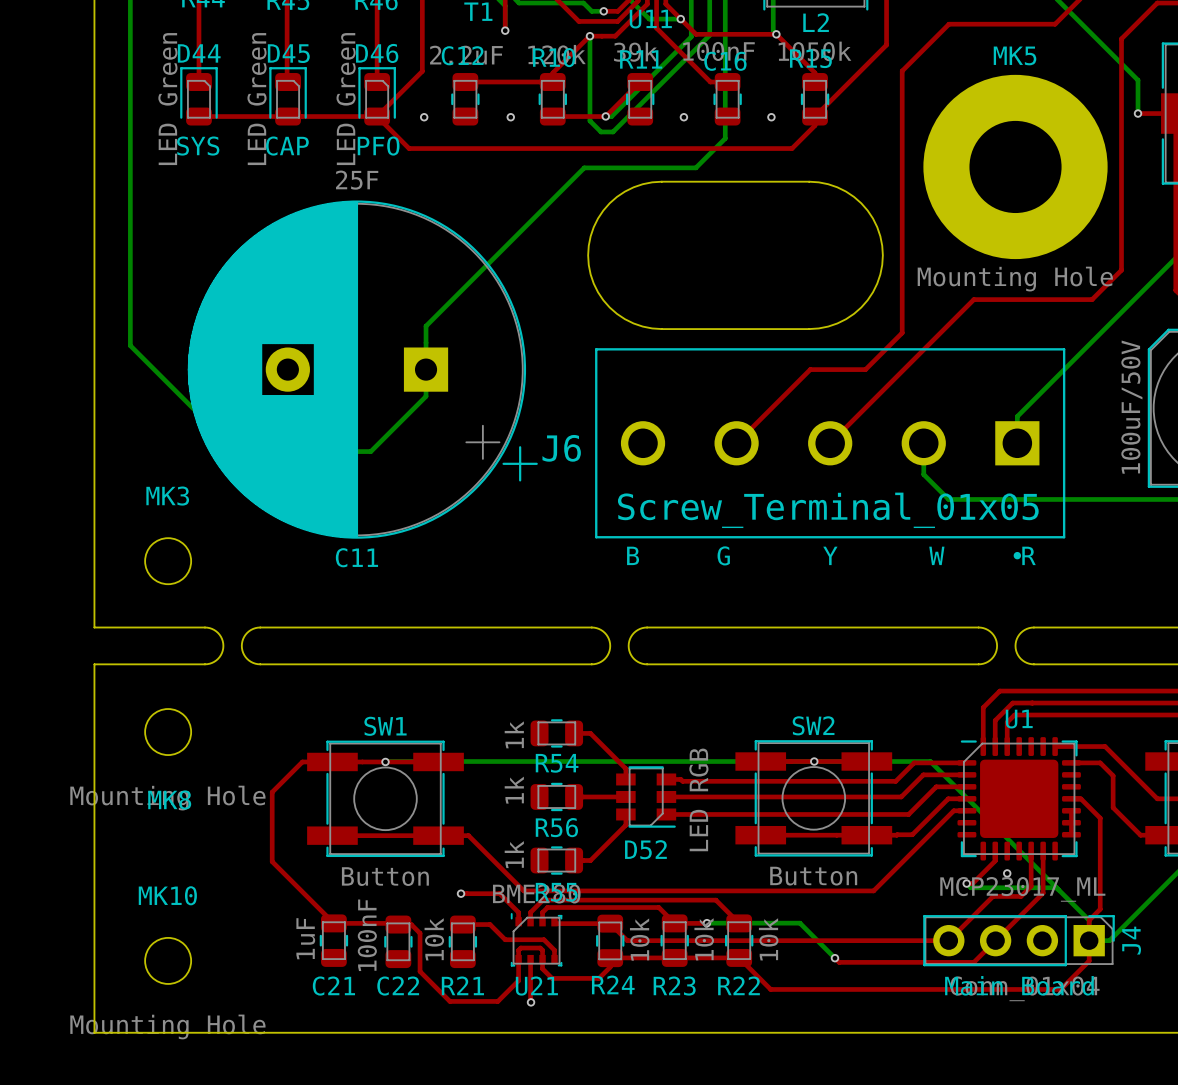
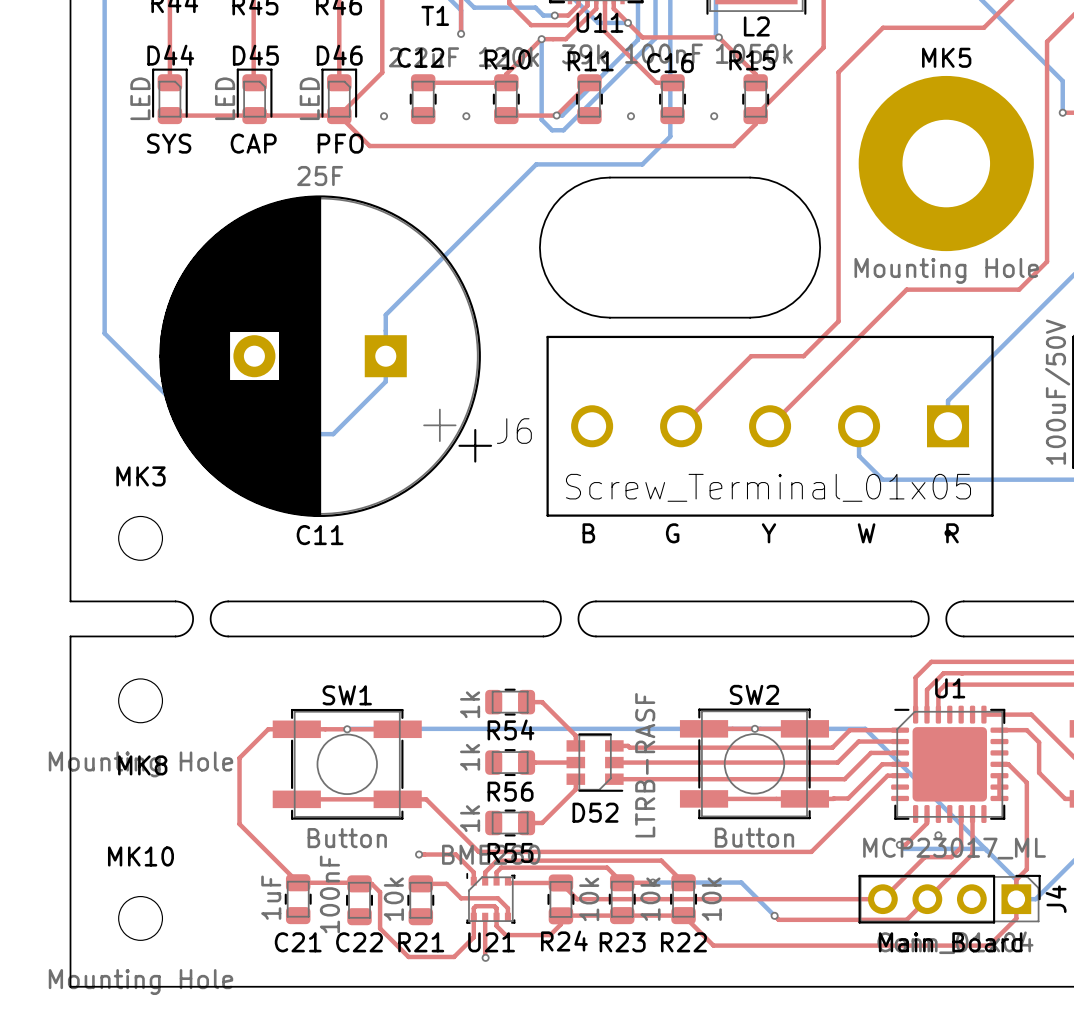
D44 value: LED Green (167, 99) -> LED (140, 98)
D45 value: LED Green (256, 99) -> LED (225, 98)
D46 value: LED Green (346, 99) -> LED (309, 98)
D52 value: LED RGB (698, 799) -> LTRB-RASF (645, 765)

